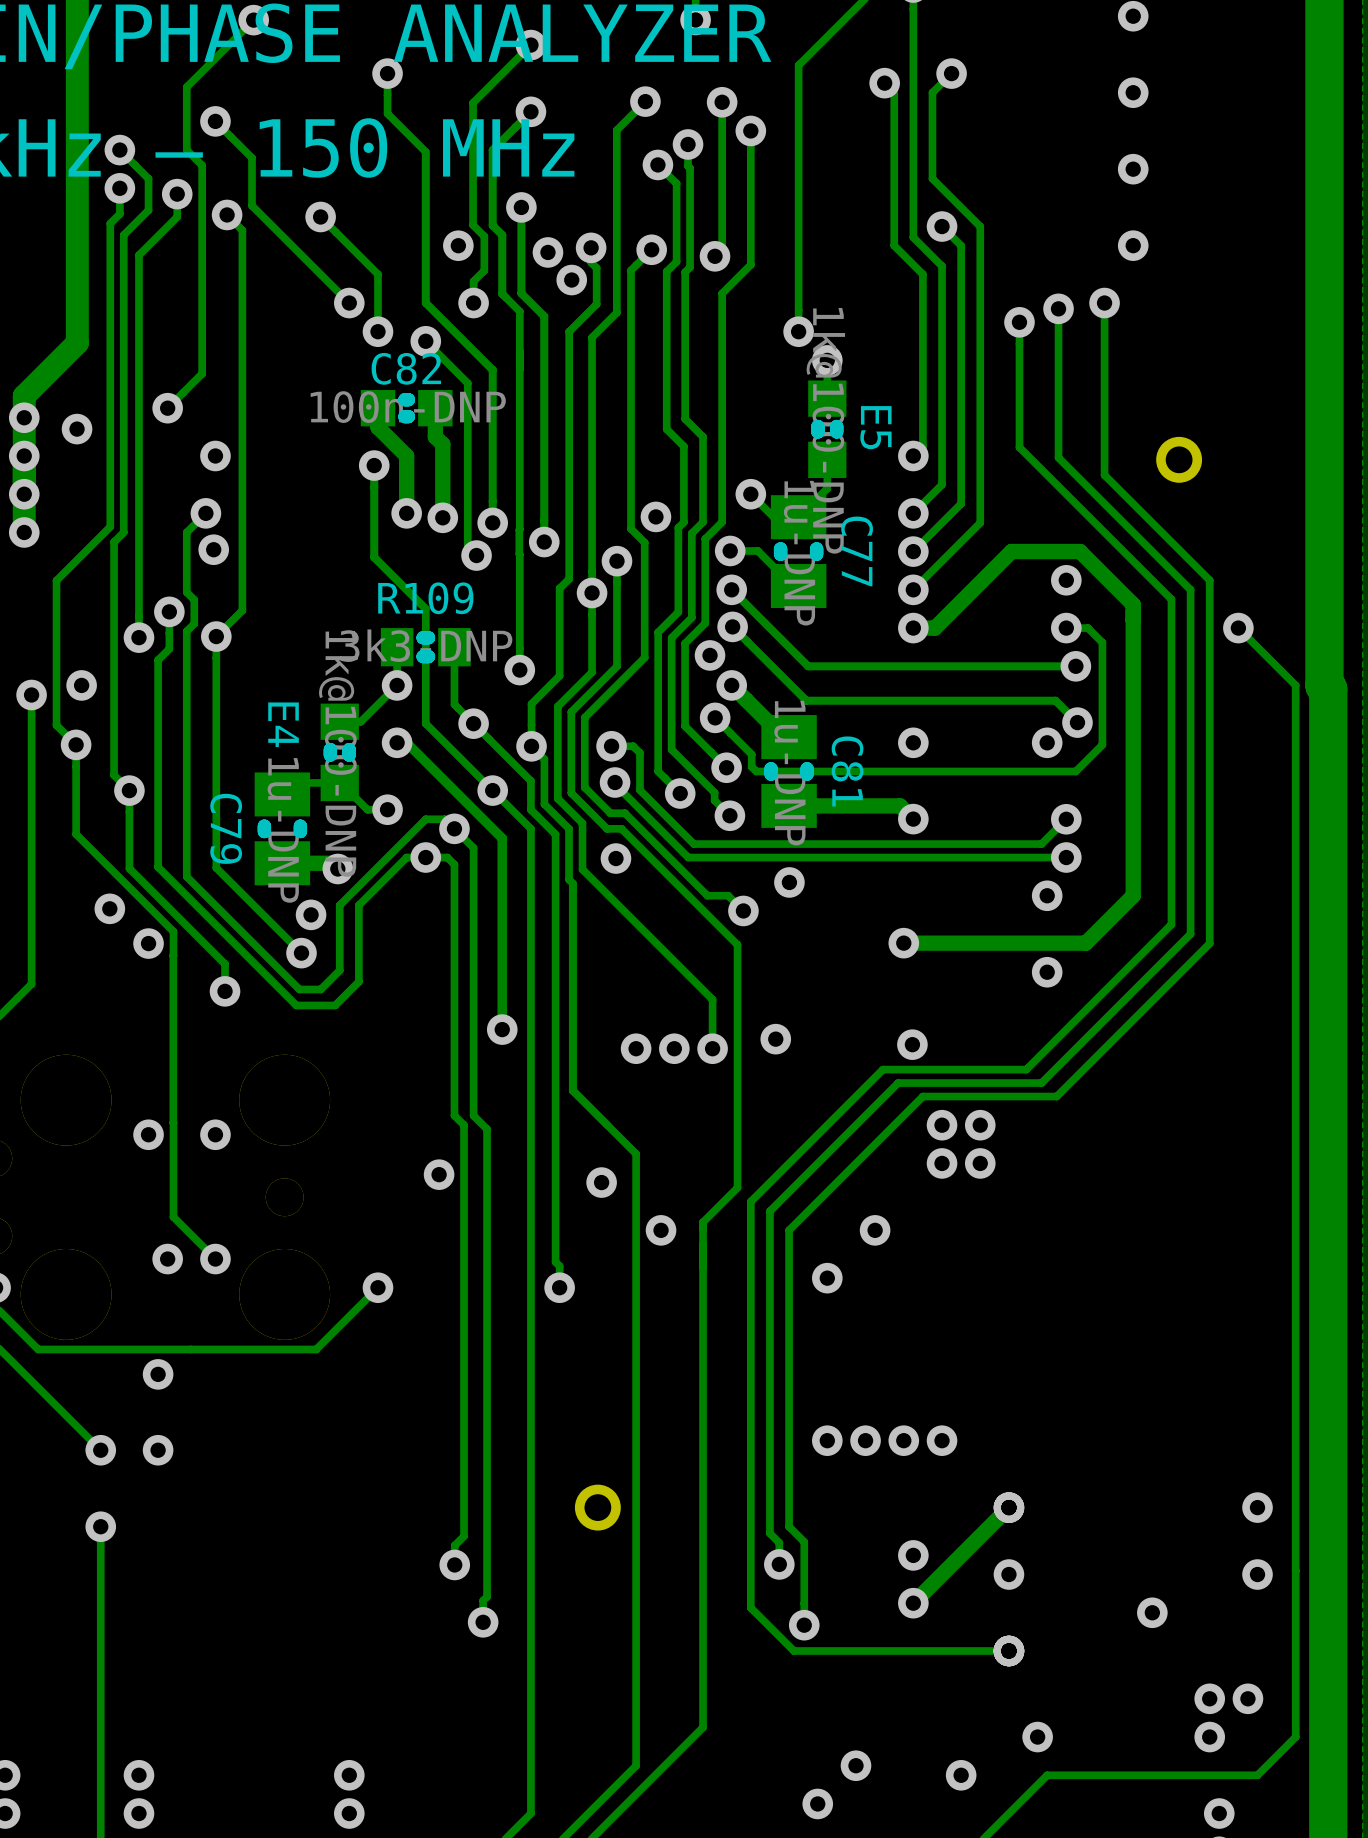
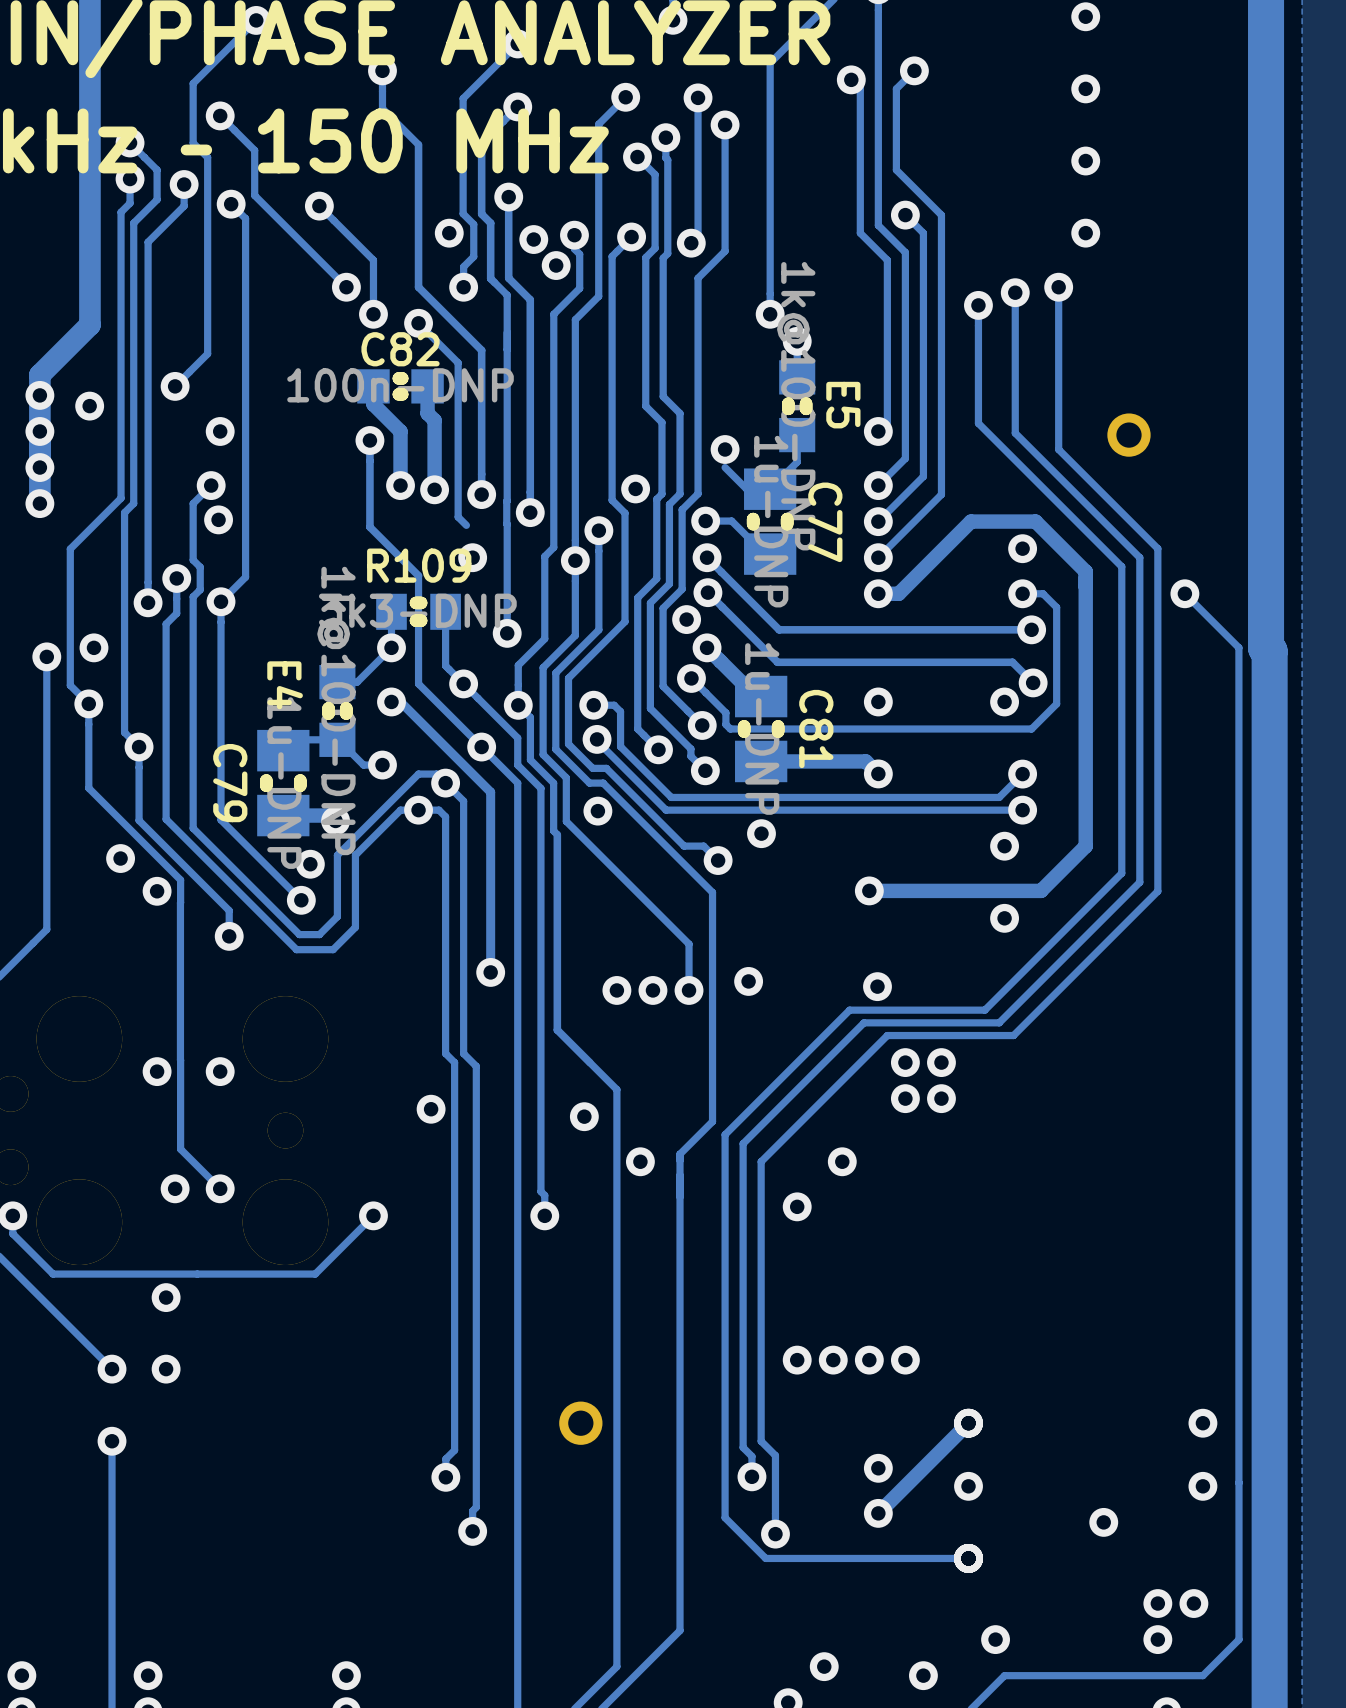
via position: (750, 494) -> (725, 449)
via position: (476, 555) -> (472, 557)

